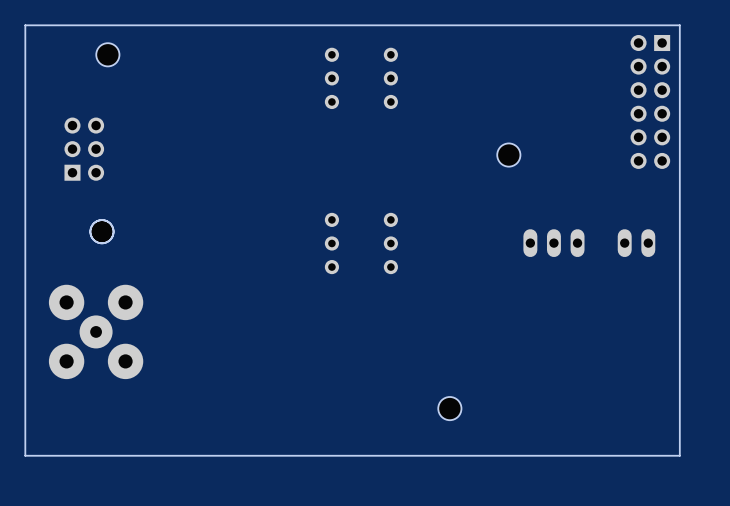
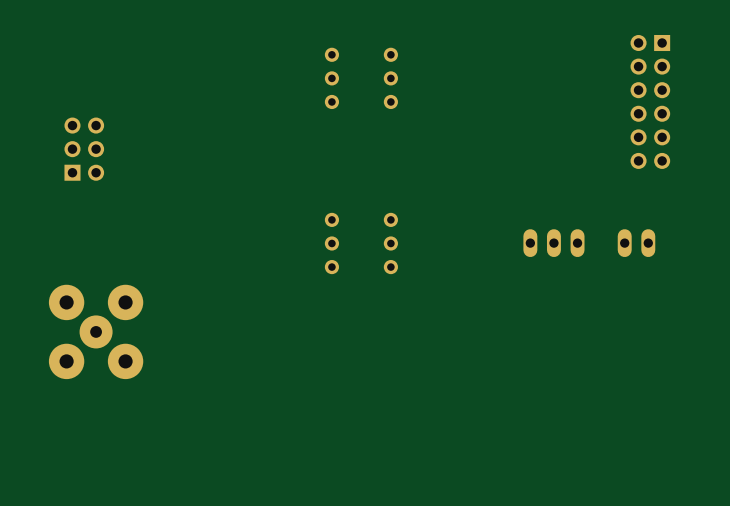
board edge: (679, 25) (679, 455) (25, 455) (25, 25) (679, 25) -> none
part: (107, 54) -> none
part: (508, 155) -> none
part: (101, 231) -> none
part: (449, 408) -> none

